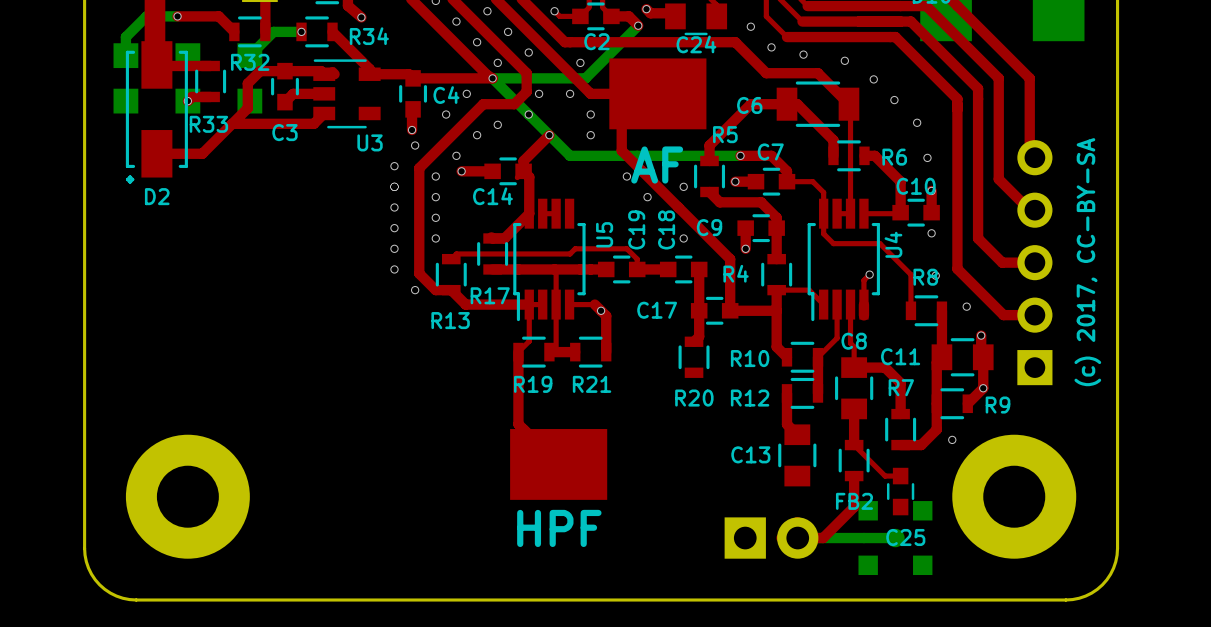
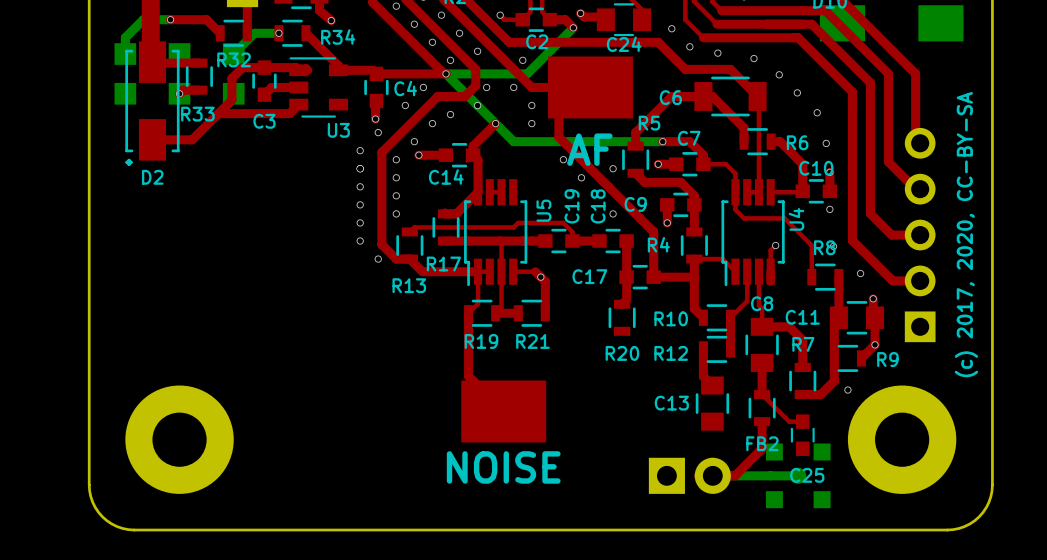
text: (c) 2017, CC-BY-SA (1087, 262) -> (c) 2017, 2020, CC-BY-SA (966, 234)
part value: HPF (559, 528) -> NOISE (503, 467)

